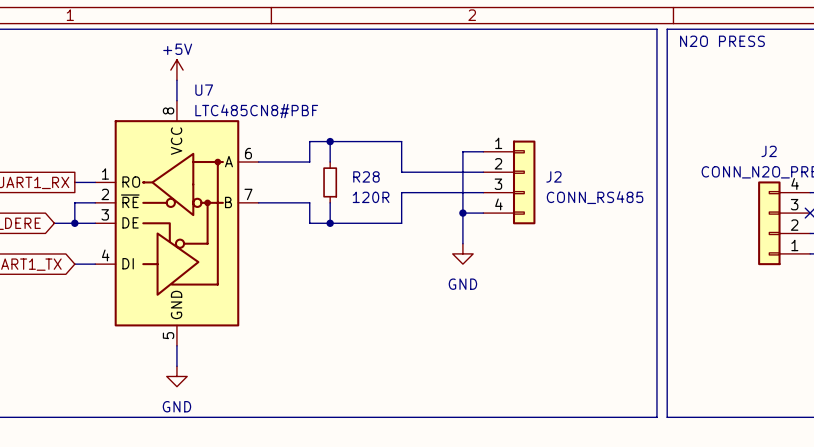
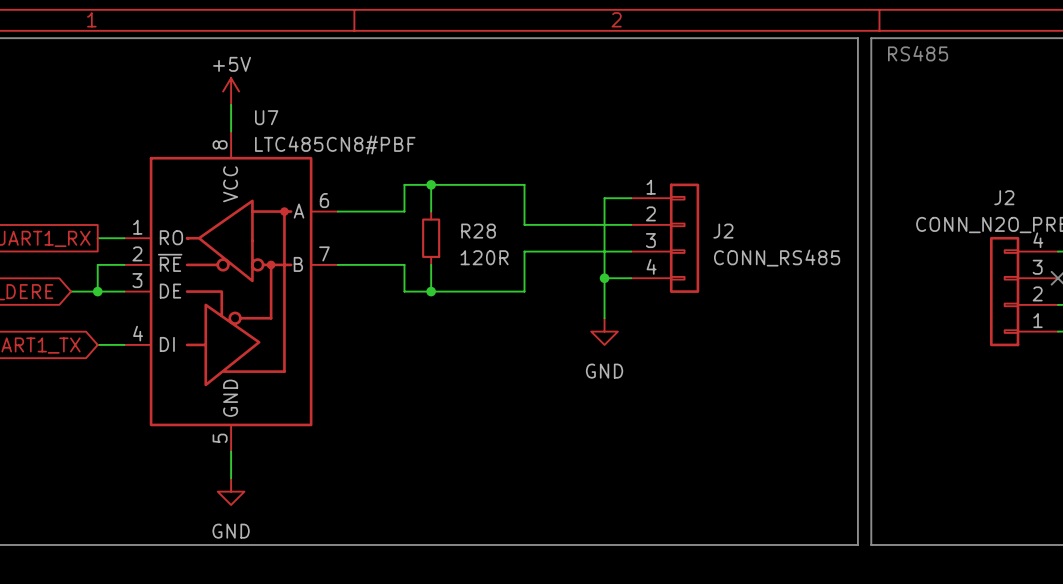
text: N2O PRESS (722, 41) -> RS485 (918, 53)

